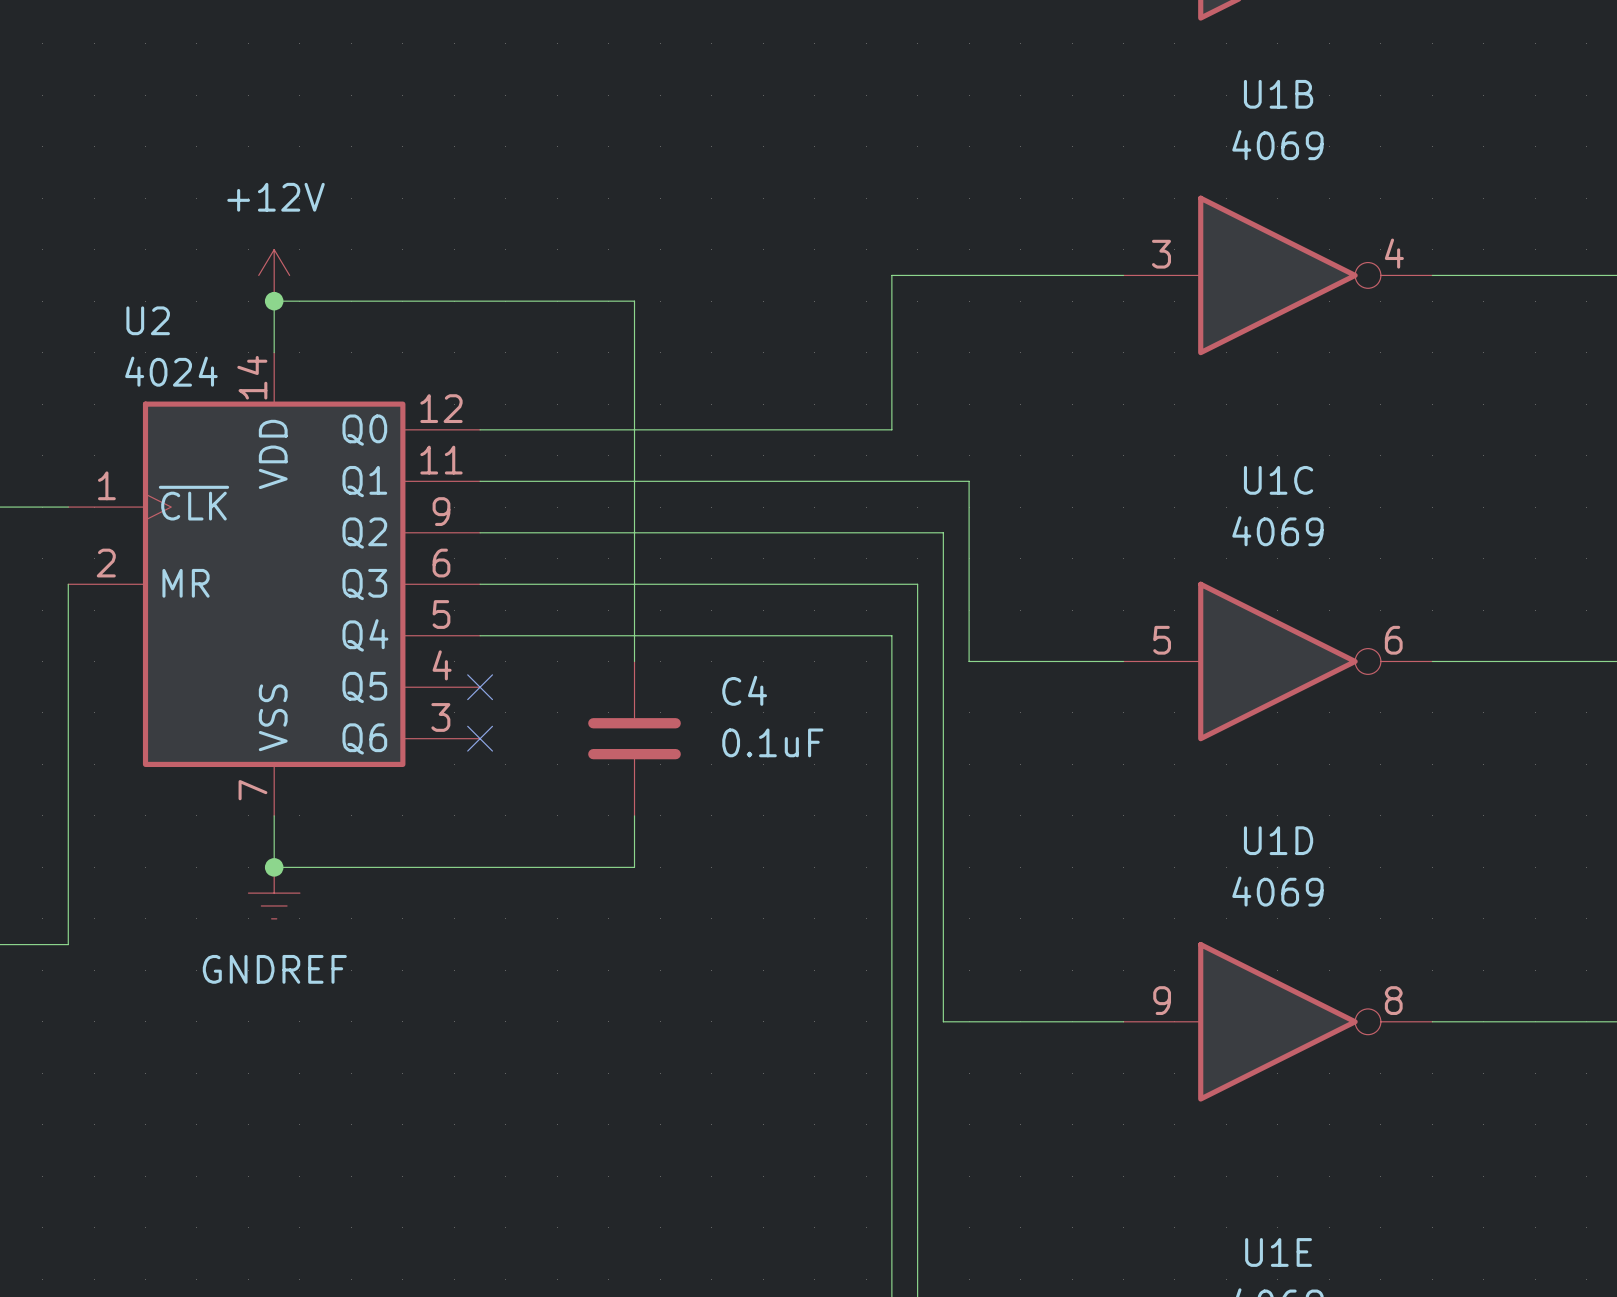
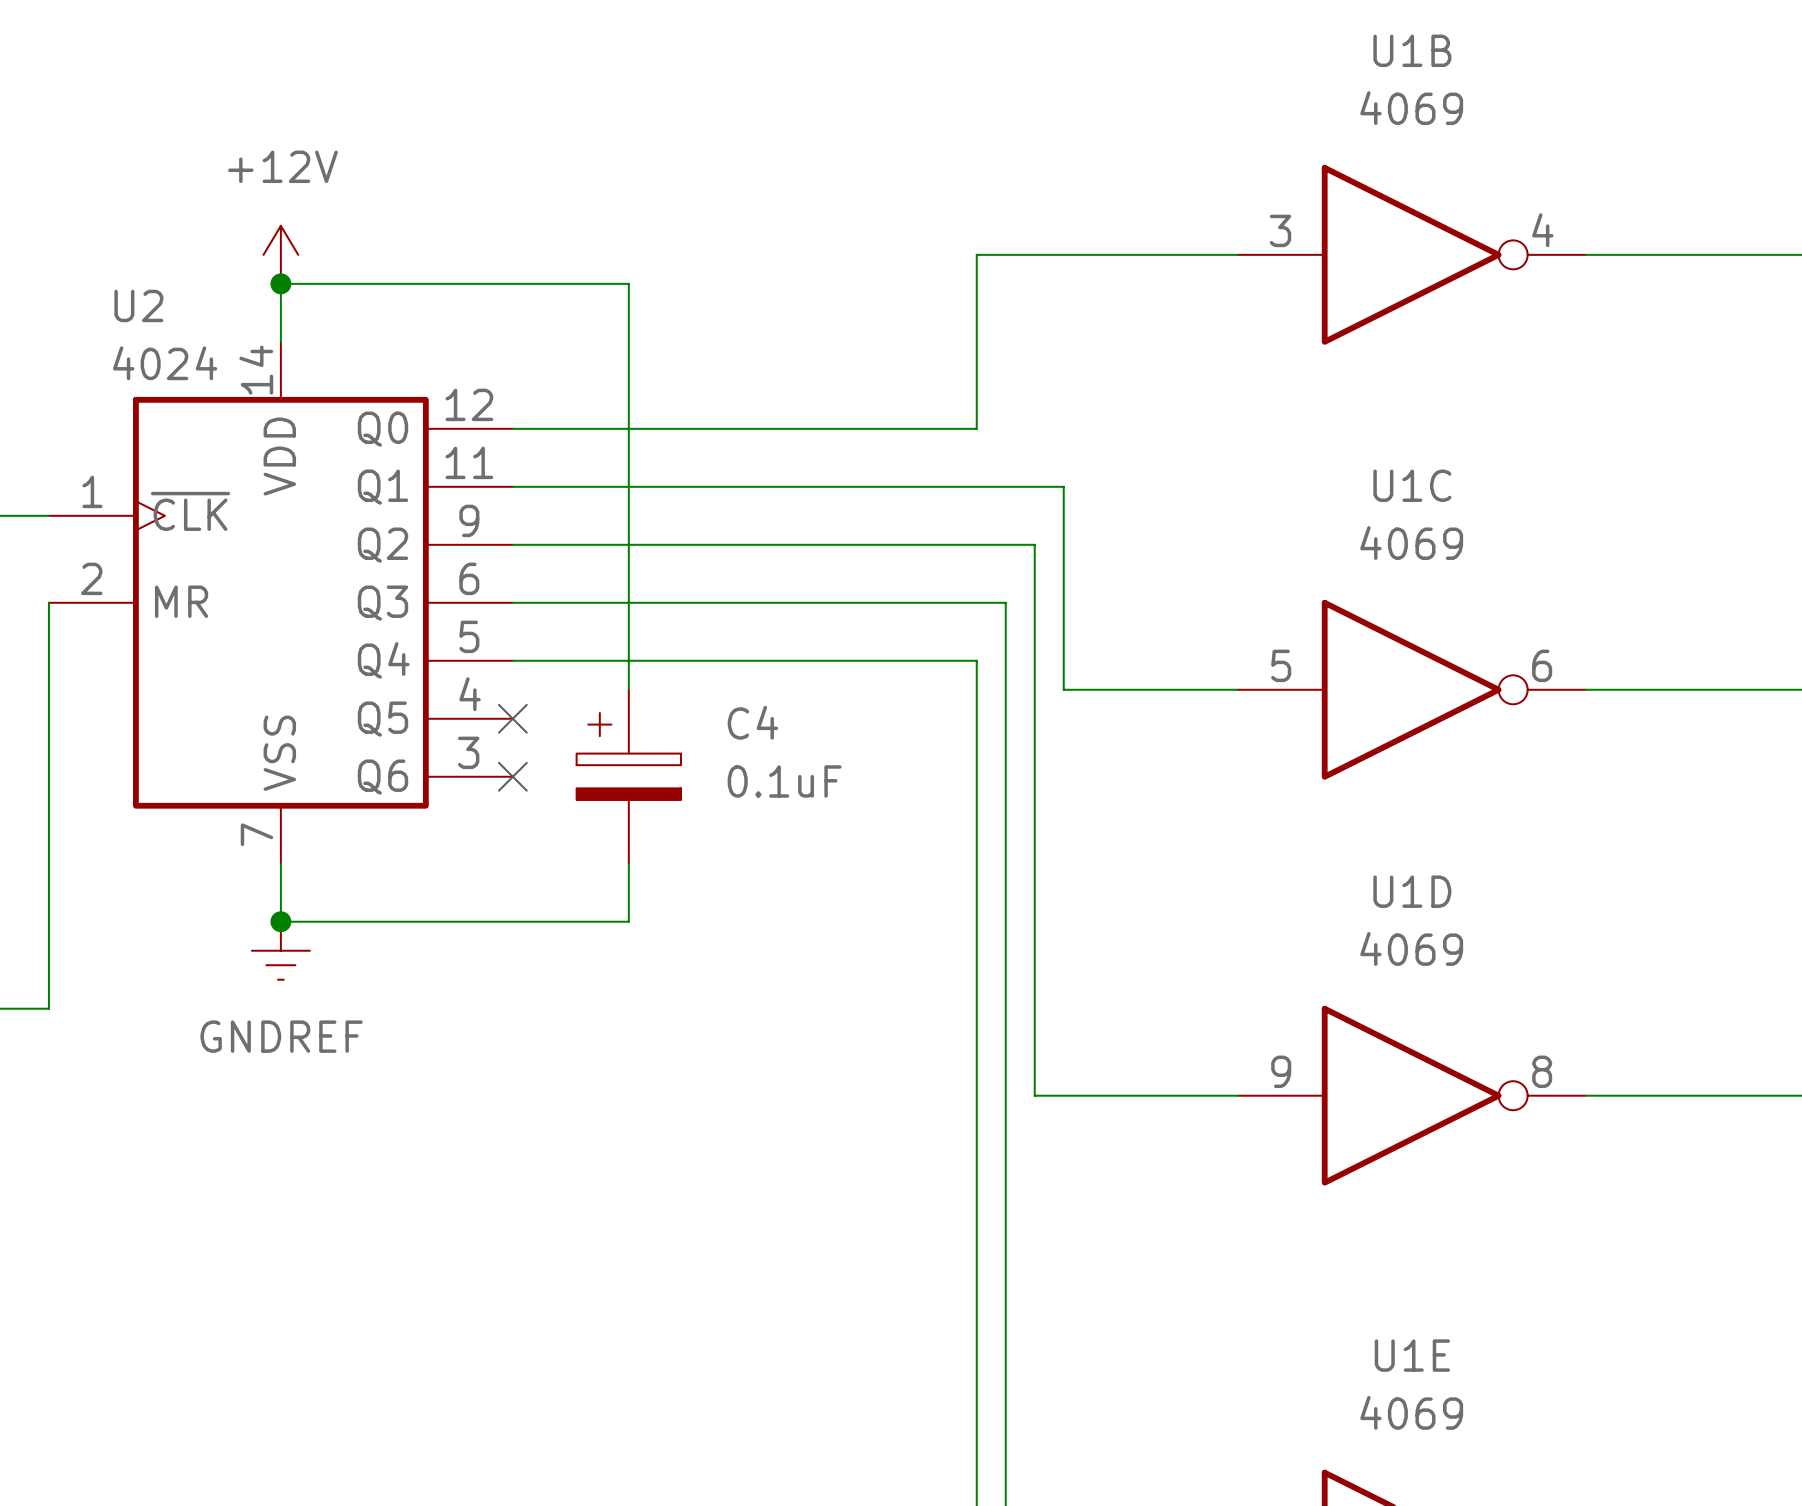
wire: (583, 301) (634, 301) (634, 661) -> (628, 283) (628, 689)
C4 symbol: [588, 661, 681, 816] -> [576, 689, 682, 864]
wire: (634, 815) (634, 867) (583, 867) -> (628, 863) (628, 921)

